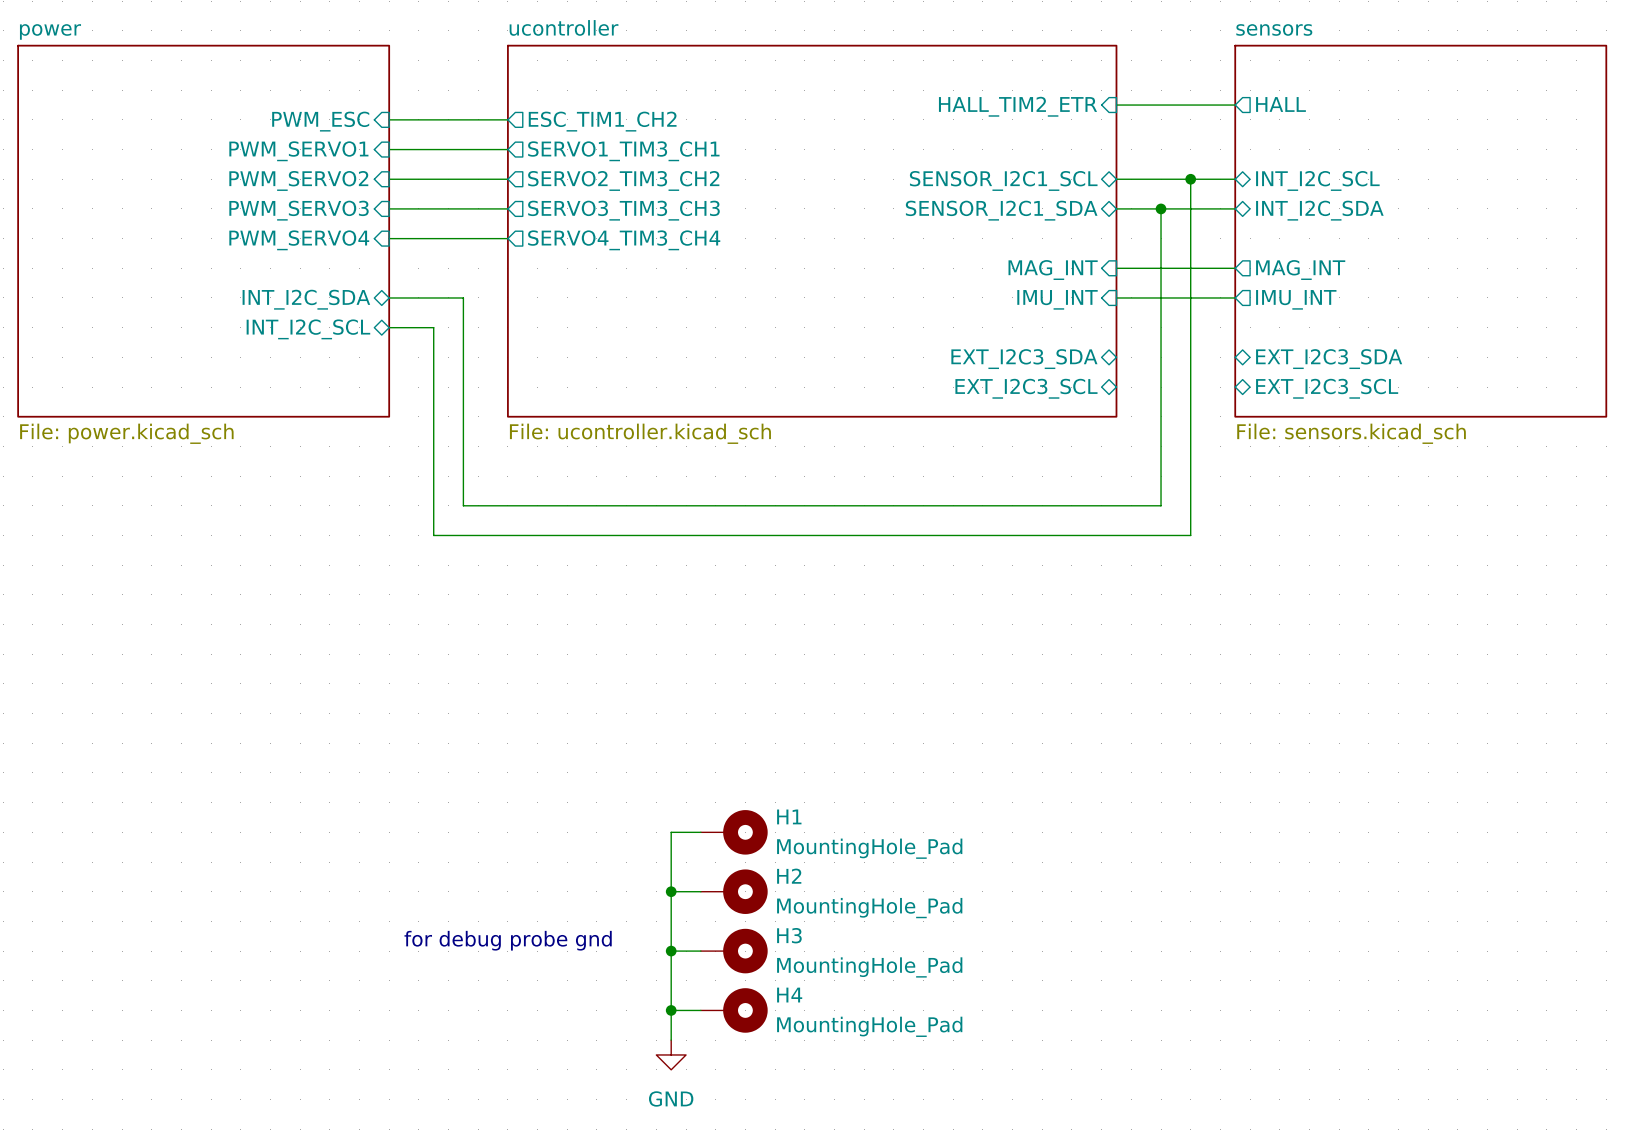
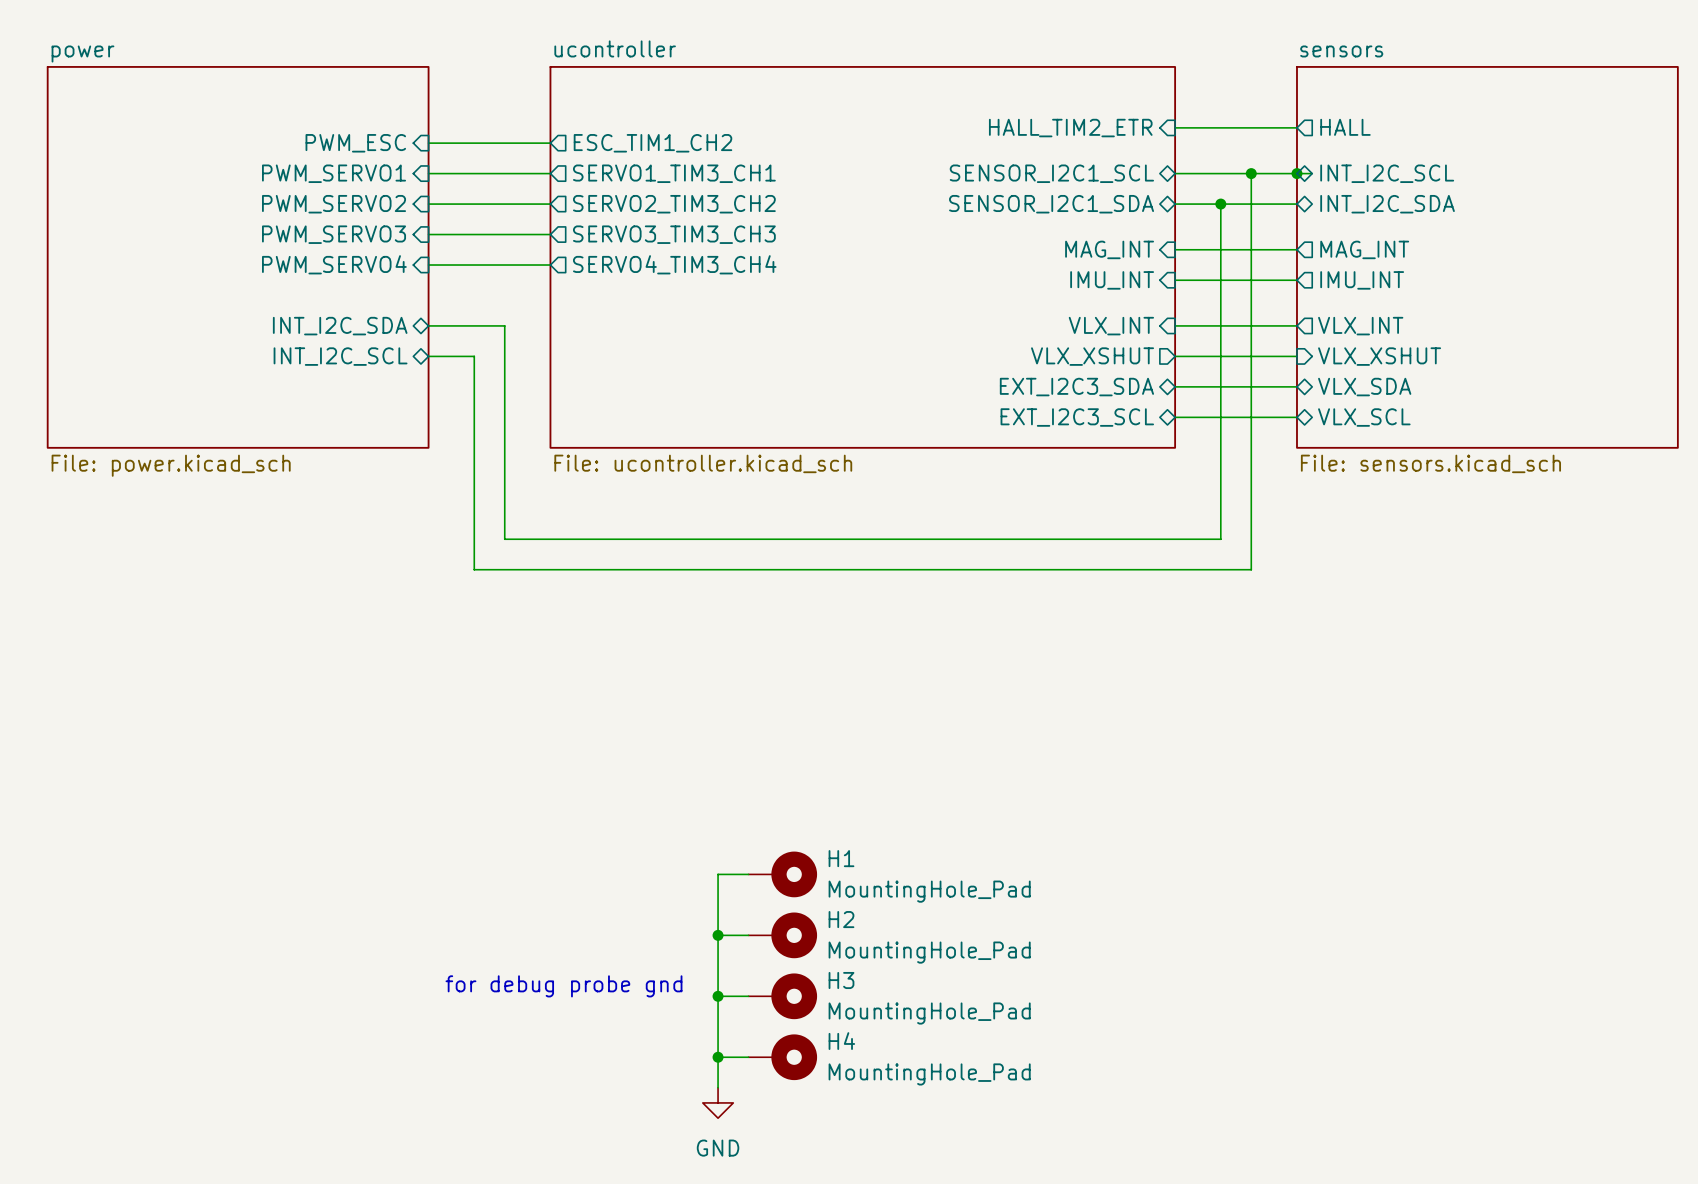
wire: none -> (1175, 173) (1312, 173)
wire: none -> (1251, 173) (1251, 204)
junction: none -> (1251, 173)
junction: none -> (1296, 173)
sheet pin: none -> SENSOR_I2C1_SCL (1051, 173)
sheet pin: none -> INT_I2C_SCL (1387, 173)
wire: none -> (1220, 204) (1220, 234)
junction: none -> (1220, 204)
junction: (1190, 179) -> none
sheet pin: SENSOR_I2C1_SCL (1003, 180) -> SENSOR_I2C1_SDA (1051, 204)
sheet pin: INT_I2C_SCL (1317, 180) -> INT_I2C_SDA (1387, 204)
wire: (1116, 208) (1235, 208) -> (1175, 356) (1296, 356)
junction: (1161, 208) -> none
sheet pin: SENSOR_I2C1_SDA (1001, 210) -> none
sheet pin: INT_I2C_SDA (1319, 210) -> none
wire: none -> (1175, 249) (1296, 249)
wire: none -> (1175, 280) (1296, 280)
sheet pin: none -> IMU_INT (1112, 280)
sheet pin: none -> IMU_INT (1362, 280)
wire: (1116, 268) (1235, 268) -> (1175, 417) (1296, 417)
sheet pin position: MAG_INT (1053, 270) -> MAG_INT (1109, 249)
sheet pin position: MAG_INT (1300, 270) -> MAG_INT (1364, 249)
sheet pin: IMU_INT (1057, 299) -> VLX_INT (1111, 326)
sheet pin: IMU_INT (1296, 299) -> VLX_INT (1360, 326)
sheet pin: none -> VLX_XSHUT (1092, 356)
sheet pin: none -> VLX_XSHUT (1379, 356)
wire: none -> (1175, 386) (1296, 386)
sheet pin: EXT_I2C3_SDA (1329, 359) -> VLX_SDA (1364, 387)
sheet pin: EXT_I2C3_SCL (1327, 388) -> VLX_SCL (1364, 417)

